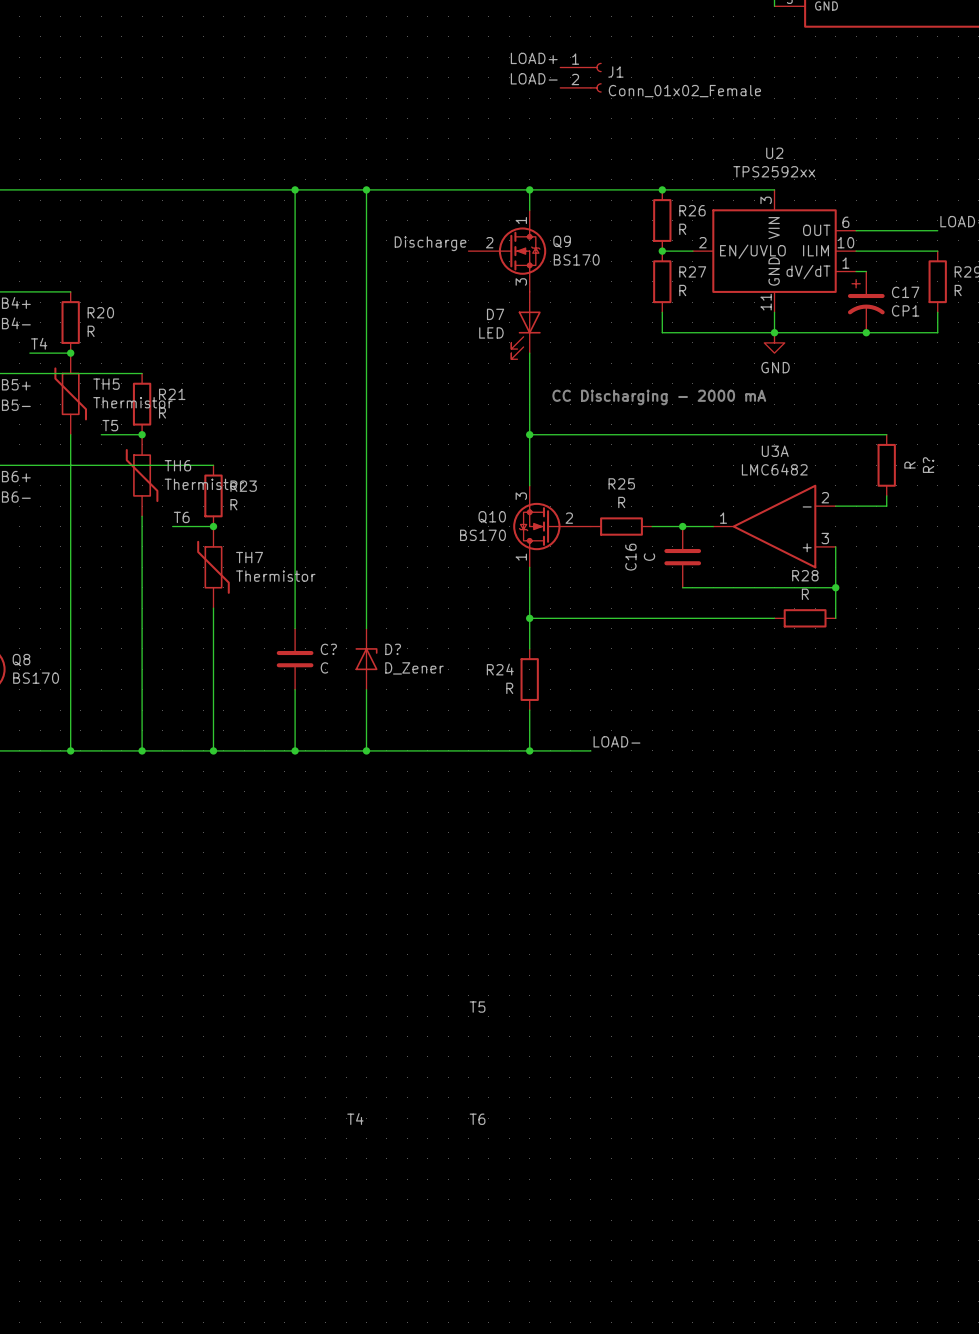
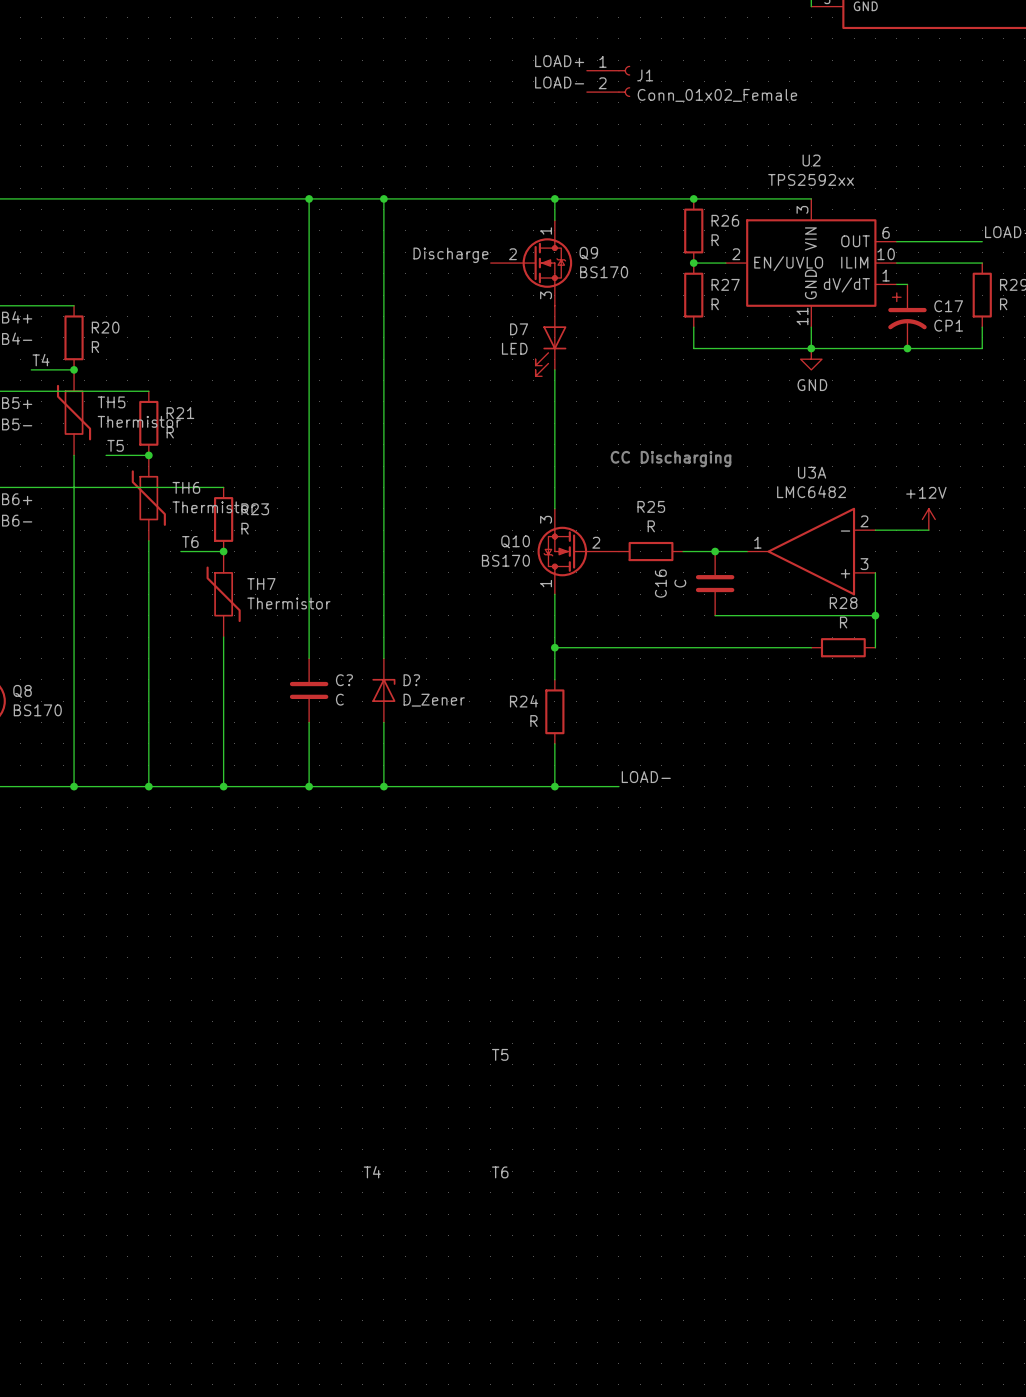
text: CC Discharging - 2000 mA (659, 397) -> none
wire: (529, 434) (886, 434) -> none
junction: (529, 434) -> none
text: none -> CC Discharging (671, 459)
R?: R (886, 465) -> none
power symbol: none -> +12V (928, 519)

